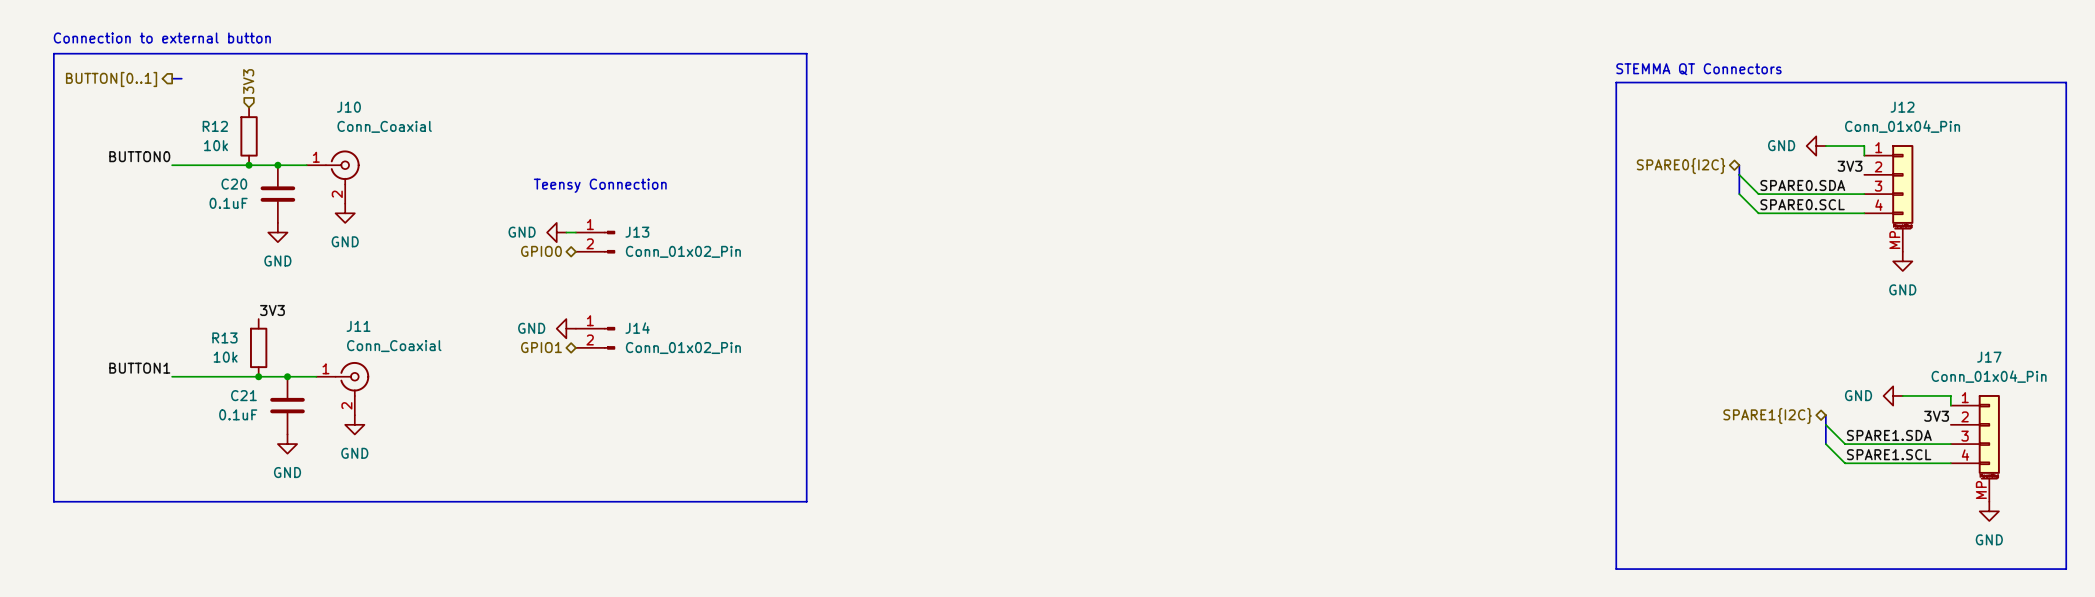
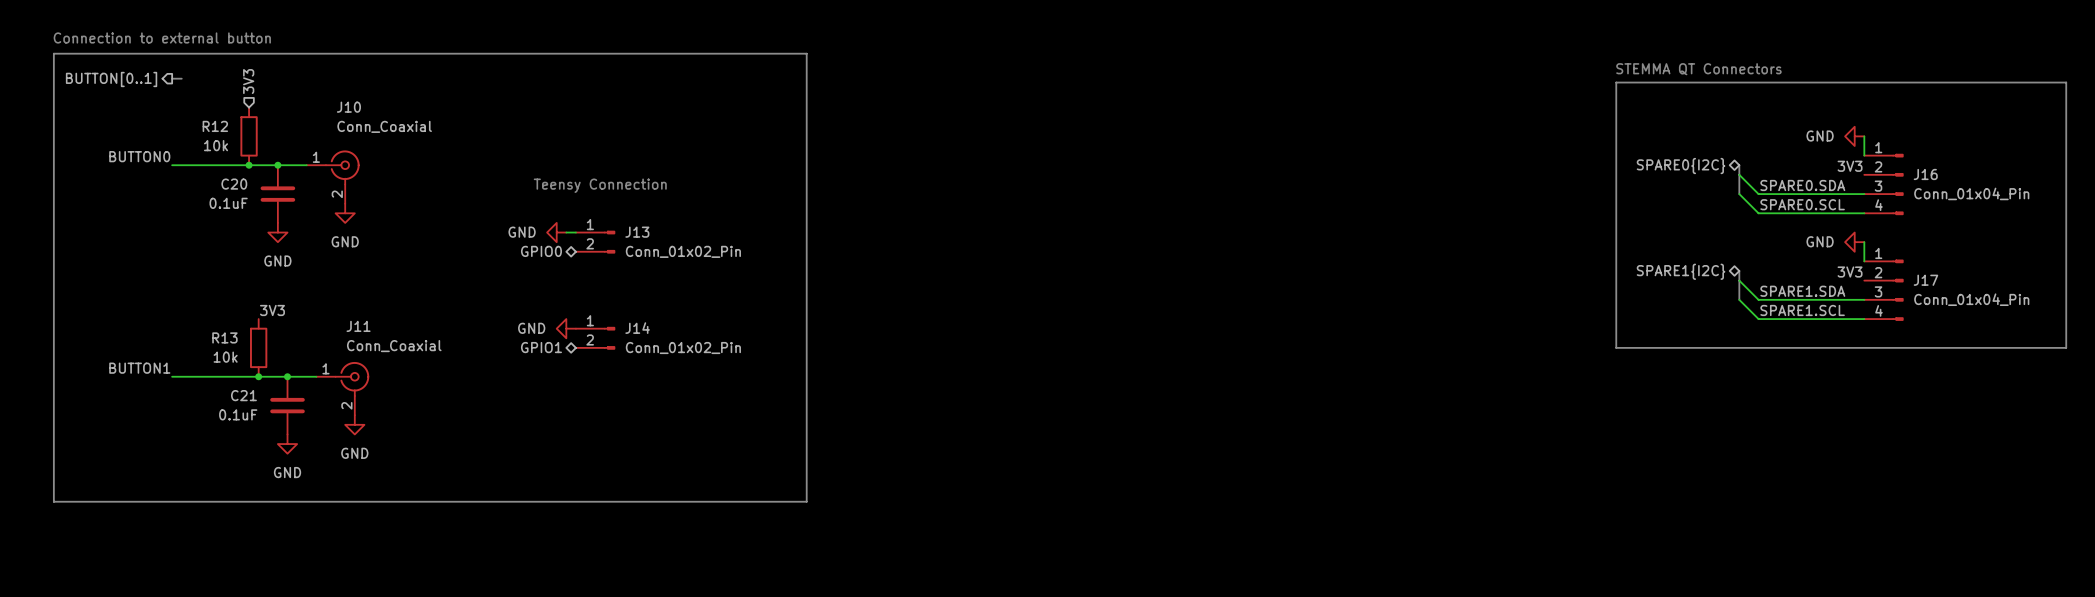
power symbol position: GND (1816, 146) -> GND (1854, 136)
wire: (1825, 146) (1864, 146) -> (1864, 136) (1864, 146)
J16: none -> Conn_01x04_Pin (1883, 184)
J12: Conn_01x04_Pin (1888, 198) -> none
power symbol: none -> GND (1854, 242)
wire: none -> (1864, 242) (1864, 261)
power symbol: GND (1902, 261) -> none
line: (1616, 347) (1616, 569) (2066, 569) (2066, 347) -> (1616, 347) (2066, 347)
J17 name position: J17 (1989, 357) -> J17 (1925, 280)
J17 value position: Conn_01x04_Pin (1989, 376) -> Conn_01x04_Pin (1971, 299)
power symbol: GND (1893, 395) -> none
wire: (1902, 395) (1950, 395) (1950, 405) -> none
J17 symbol: [1950, 395, 2000, 502] -> [1864, 259, 1904, 321]
hierarchical label position: SPARE1{I2C} (1767, 415) -> SPARE1{I2C} (1681, 271)
bus: (1825, 415) (1825, 444) -> (1739, 270) (1739, 299)
label position: 3V3 (1936, 416) -> 3V3 (1850, 272)
wire: (1825, 424) (1845, 444) (1950, 444) -> (1739, 280) (1758, 299) (1864, 299)
label position: SPARE1.SDA (1889, 435) -> SPARE1.SDA (1802, 291)
wire: (1825, 444) (1845, 463) (1950, 463) -> (1739, 299) (1758, 319) (1864, 319)
label position: SPARE1.SCL (1889, 454) -> SPARE1.SCL (1802, 310)
power symbol: GND (1989, 511) -> none

